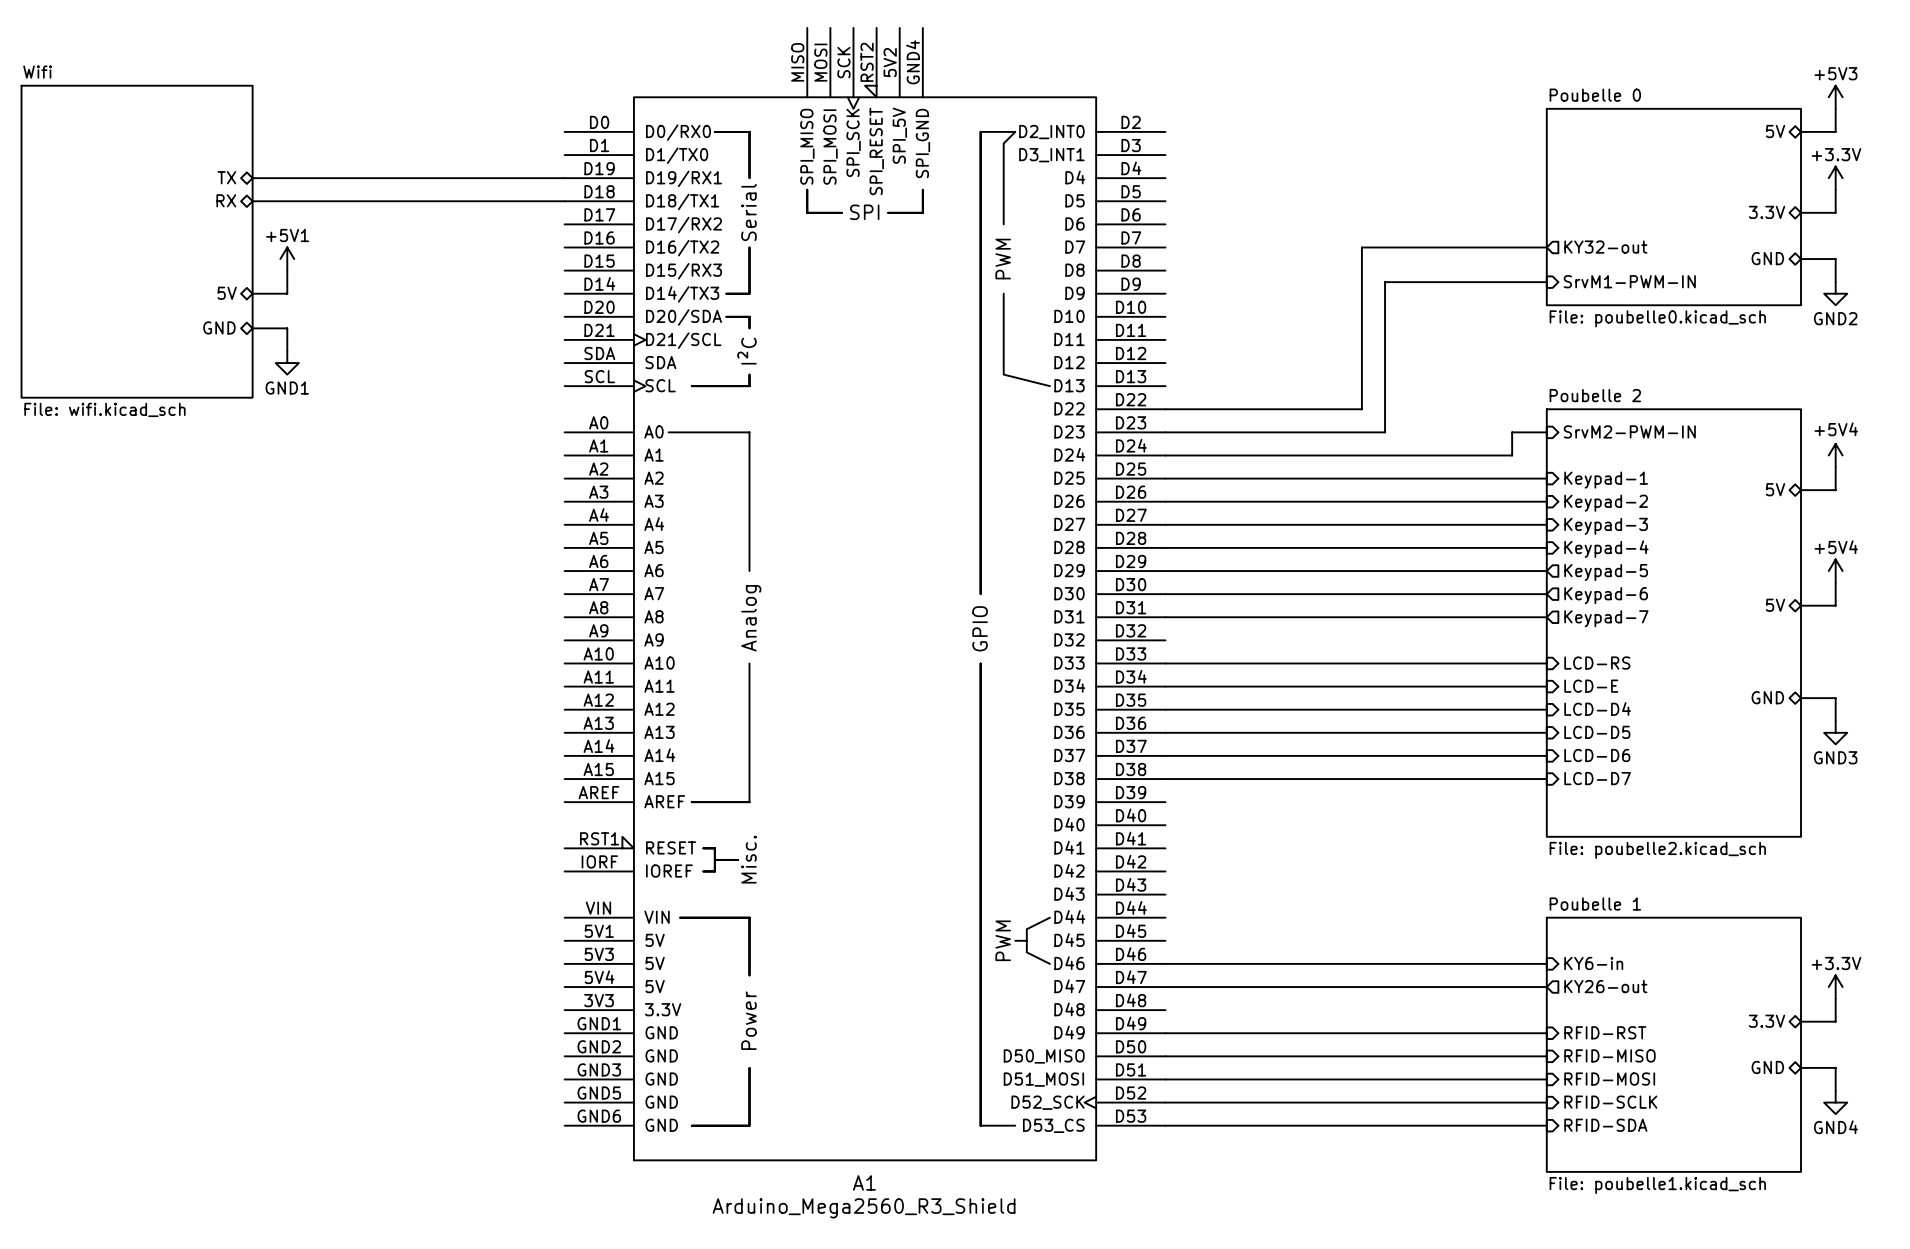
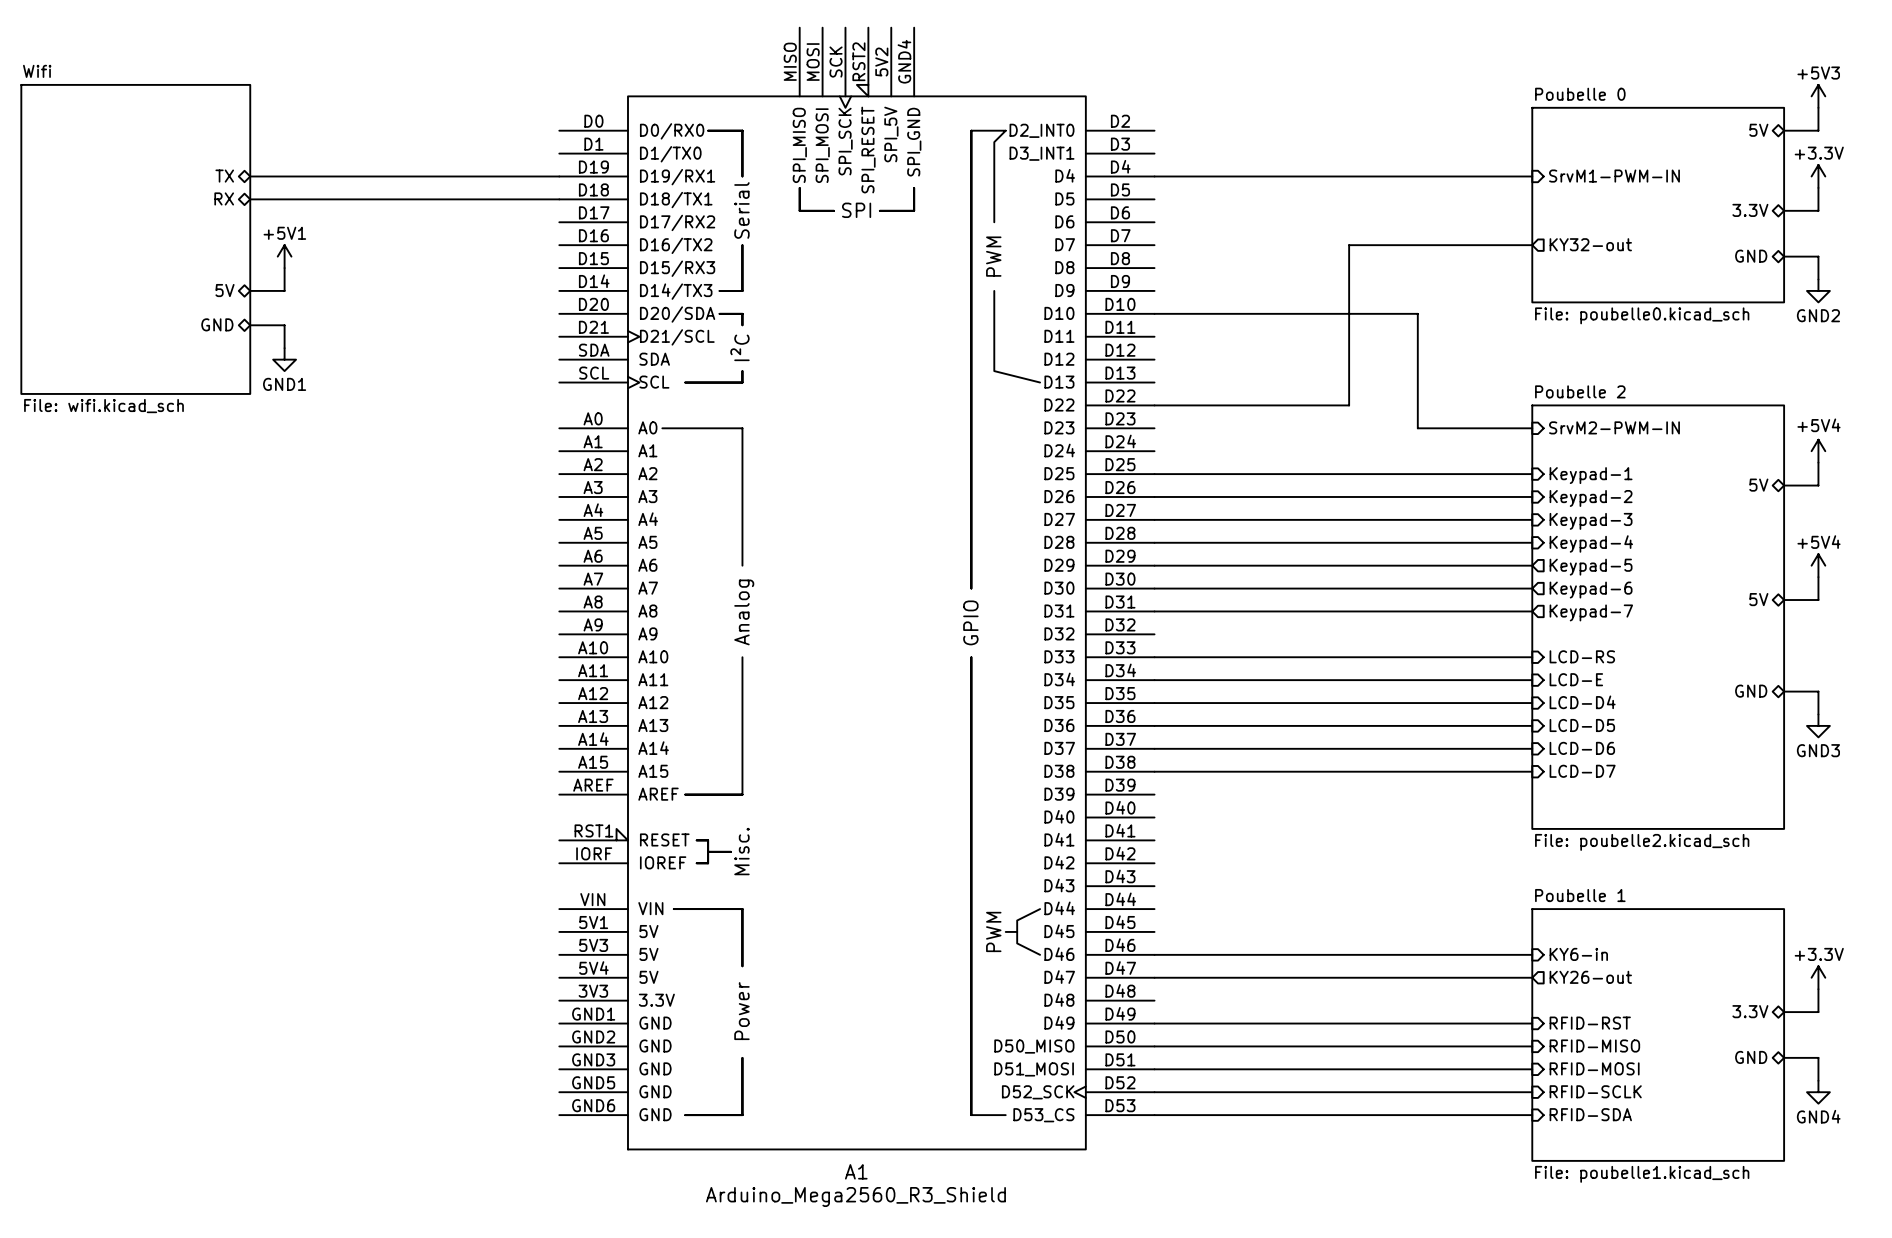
wire: none -> (1154, 176) (1532, 176)
sheet pin position: SrvM1-PWM-IN (1629, 281) -> SrvM1-PWM-IN (1614, 176)
wire: (1546, 282) (1385, 282) (1385, 432) (1165, 432) -> none
wire: (1512, 432) (1512, 455) (1165, 455) -> (1497, 428) (1417, 428) (1417, 313) (1154, 313)

